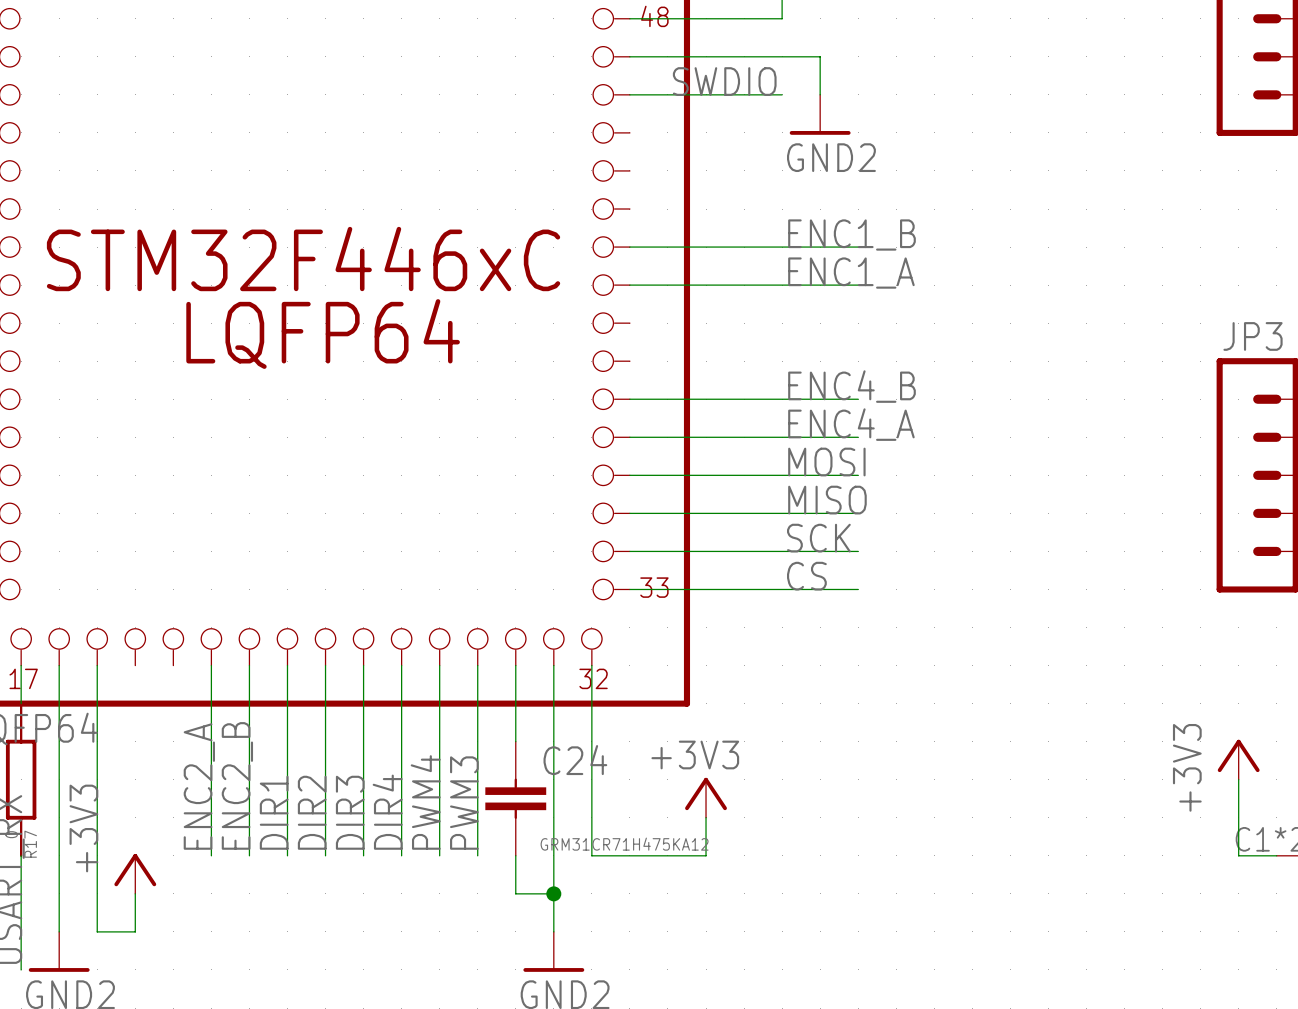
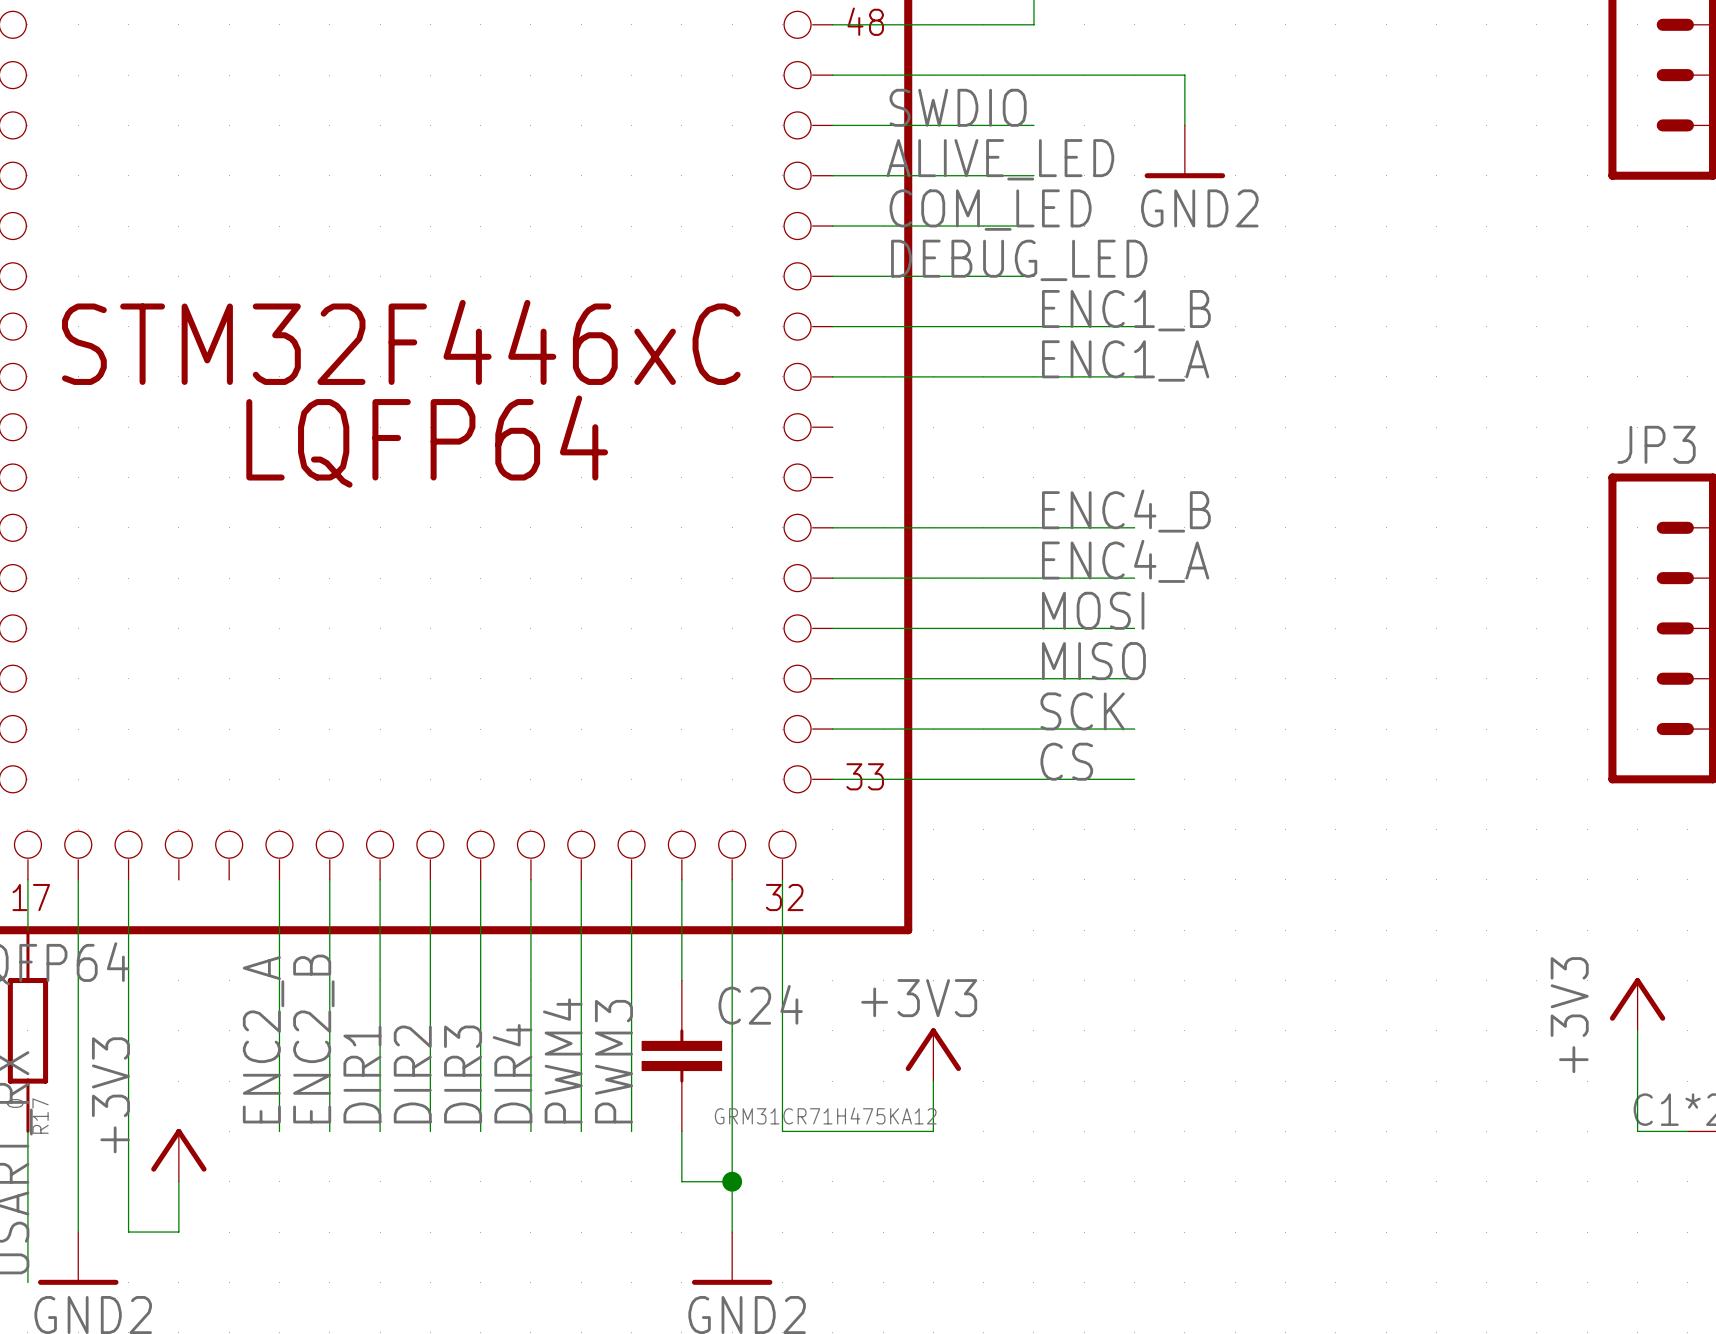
wire: (820, 56) (820, 94) -> (1084, 75) (1184, 75) (1184, 125)
power symbol position: (820, 114) -> (1184, 151)
label: none -> ALIVE_LED (1000, 159)
wire: none -> (832, 175) (1033, 175)
label position: GND2 (831, 157) -> GND2 (1199, 208)
label: none -> COM_LED (990, 210)
wire: none -> (832, 226) (1033, 226)
label: none -> DEBUG_LED (1019, 260)
wire: none -> (832, 276) (1033, 276)

